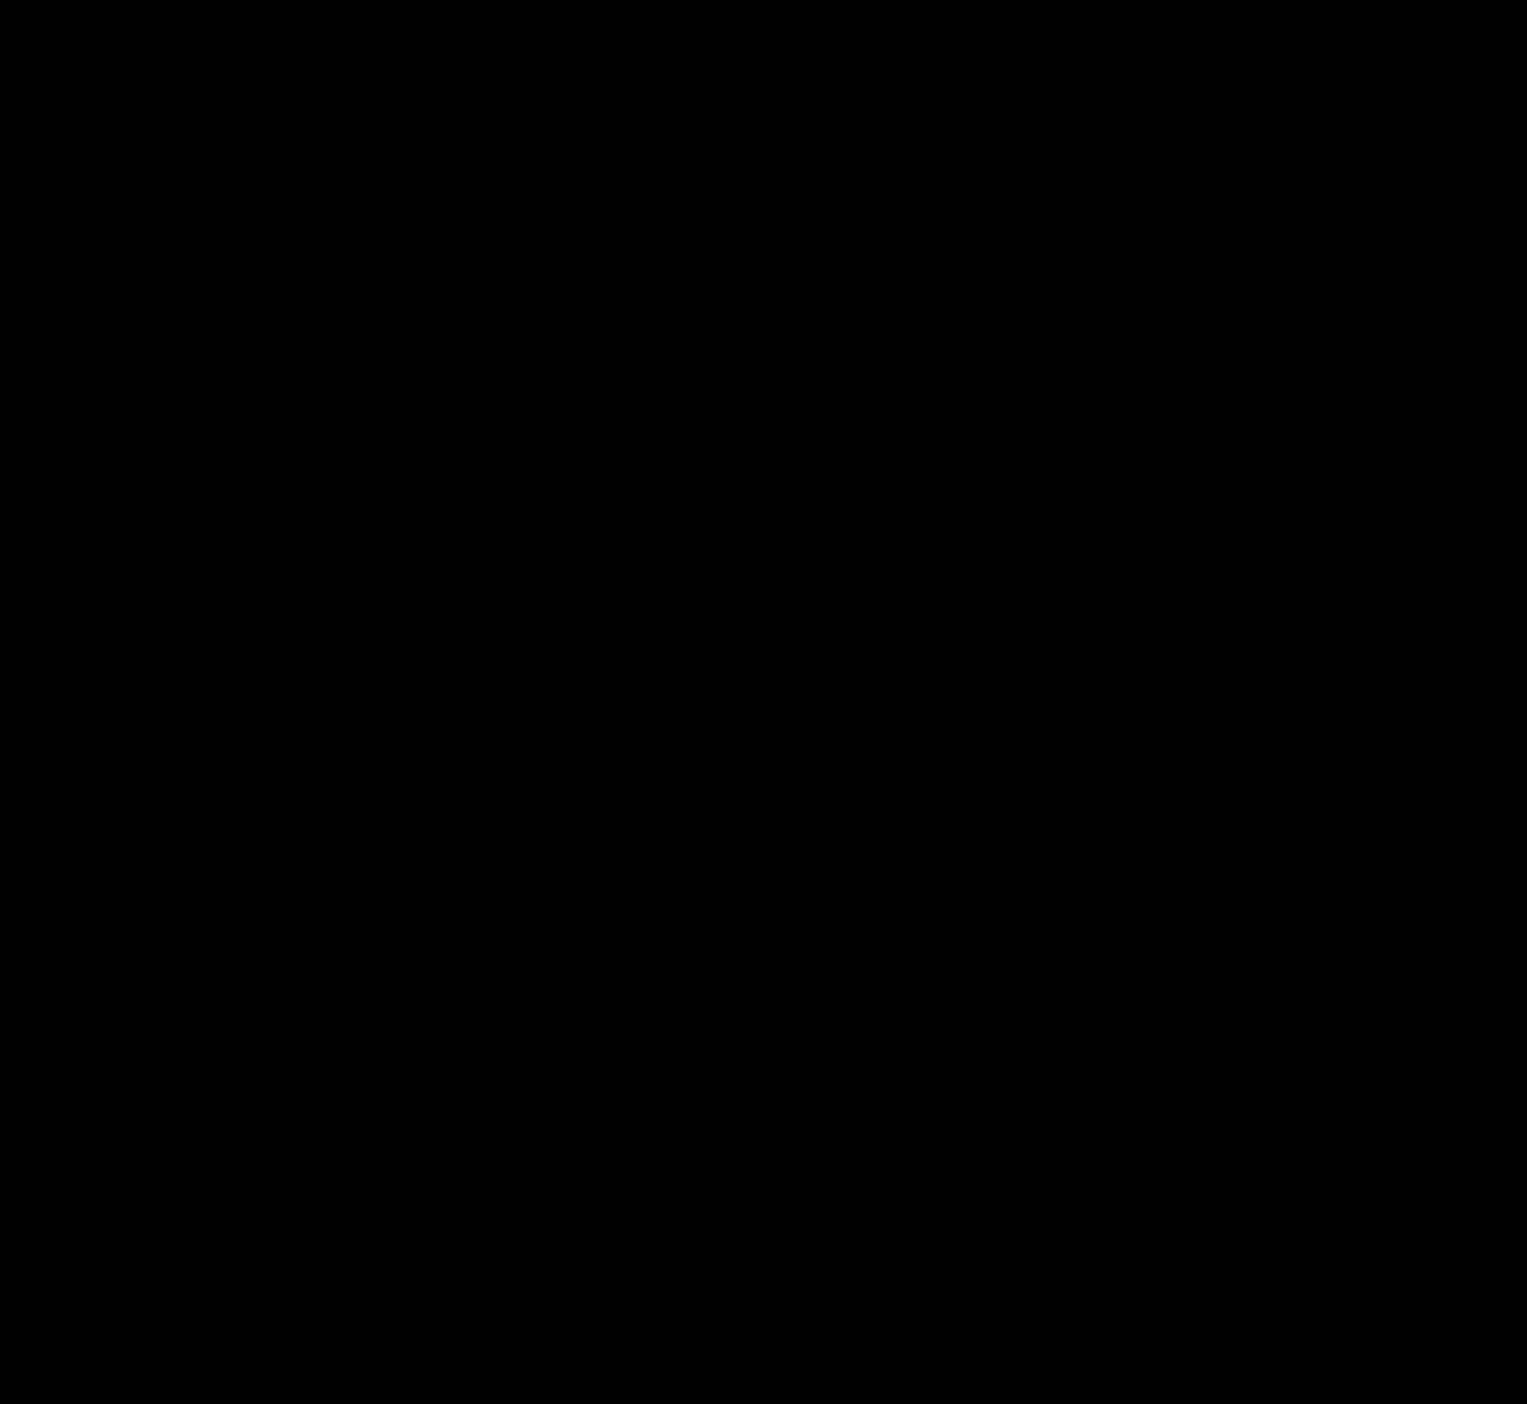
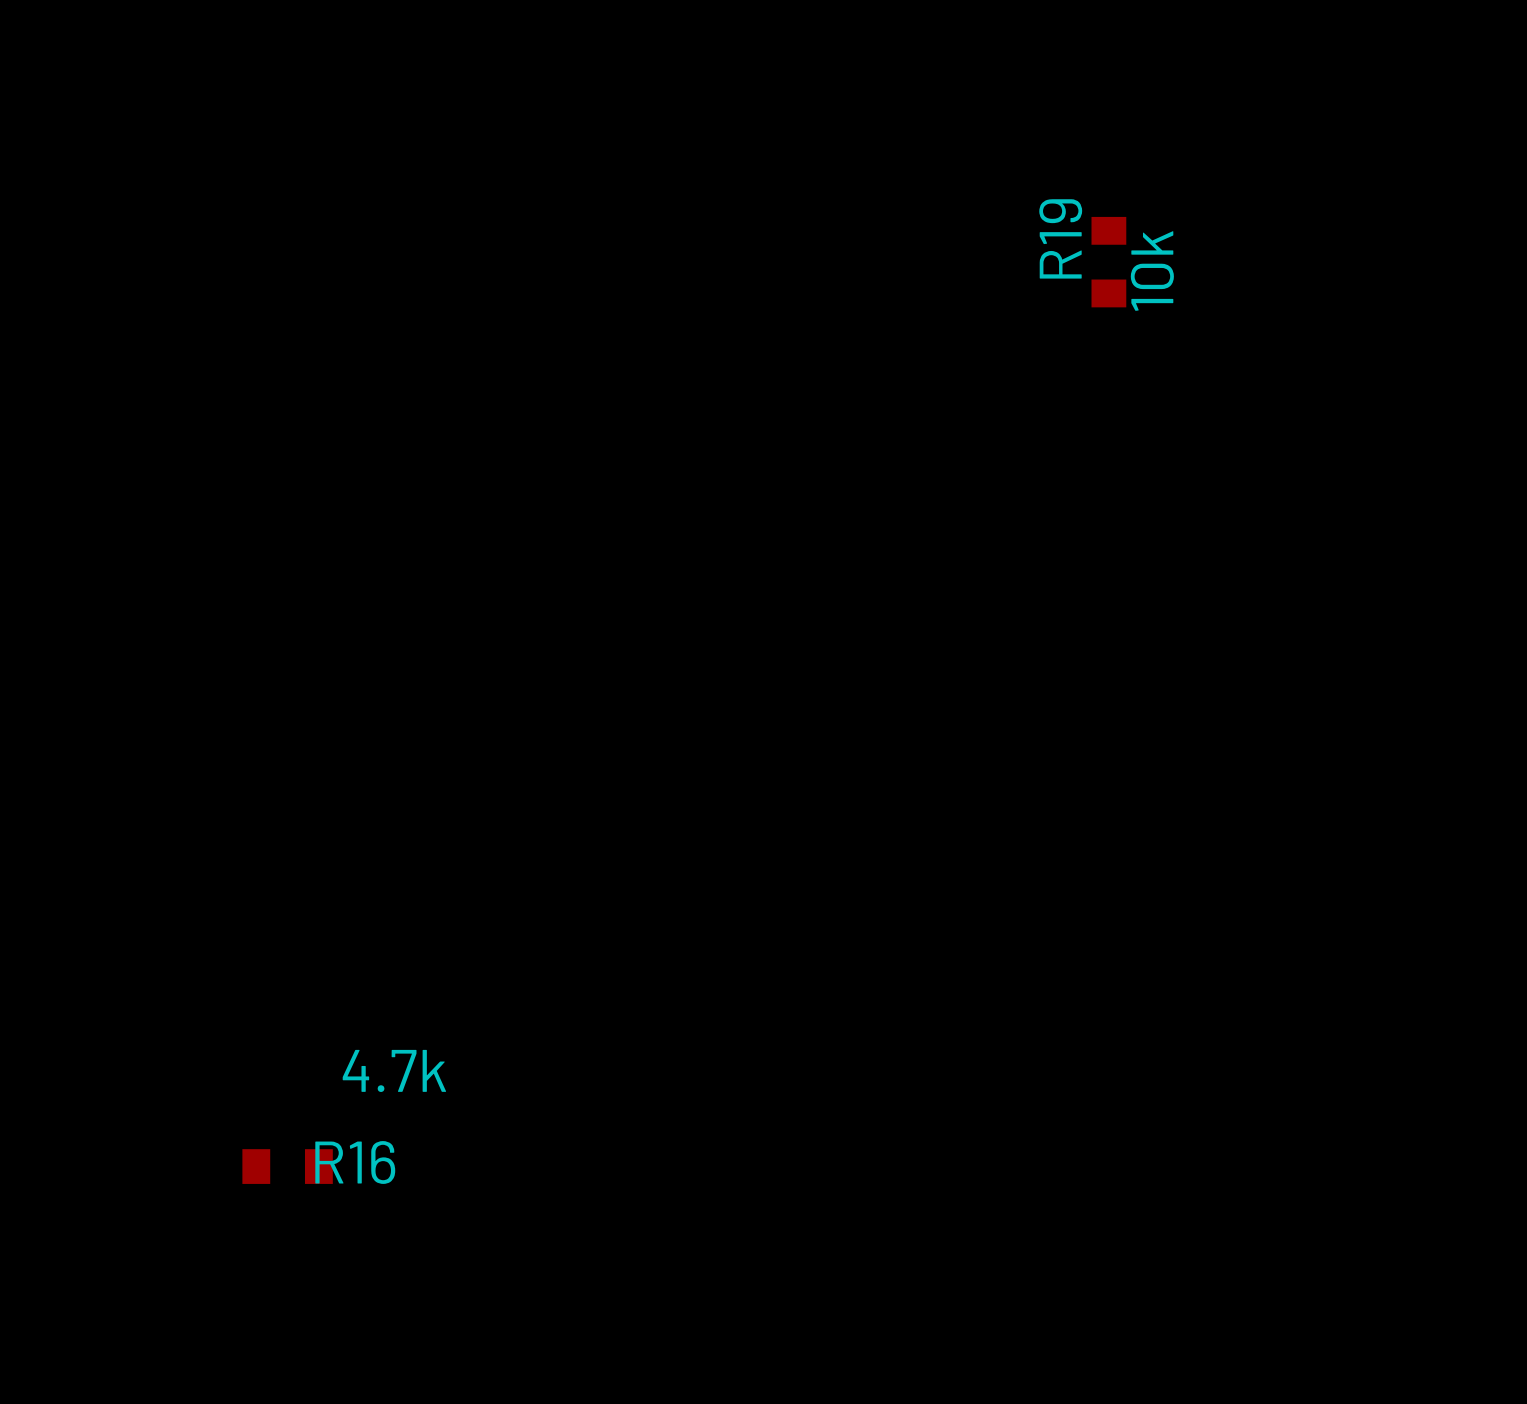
R19: none -> 10k (1108, 262)
R16: none -> 4.7k (287, 1166)

